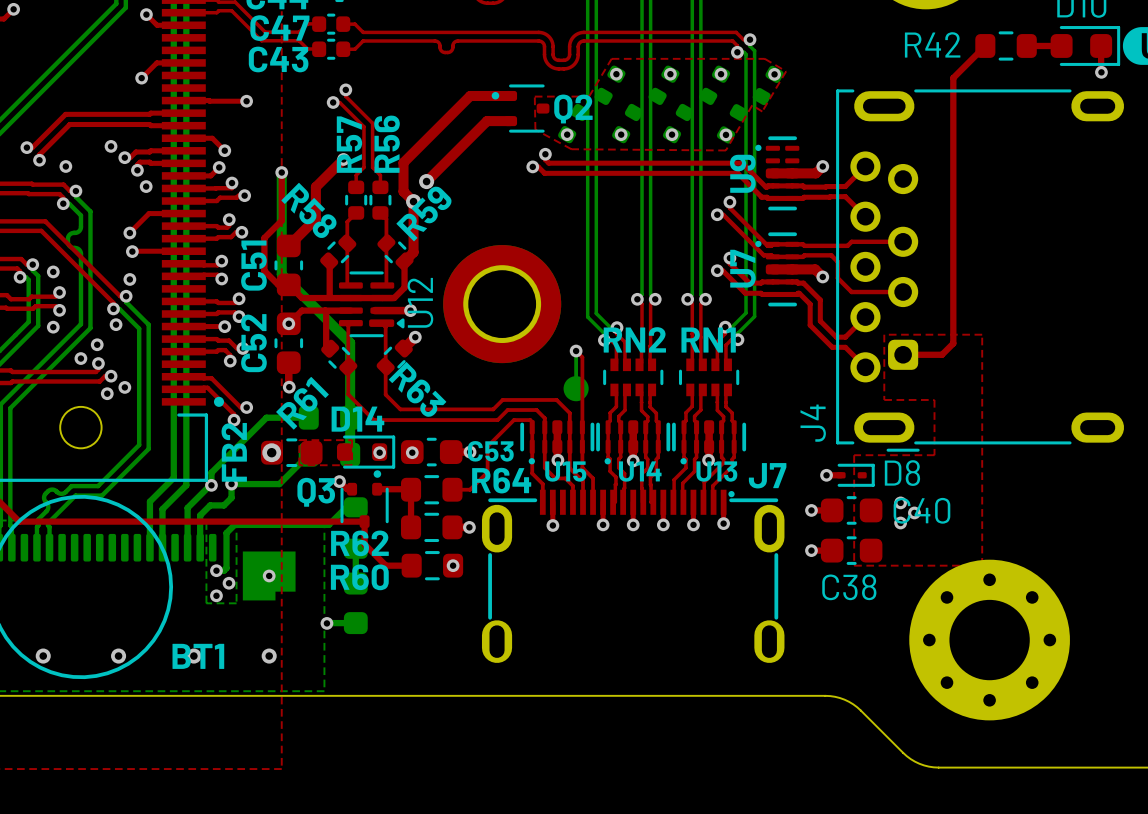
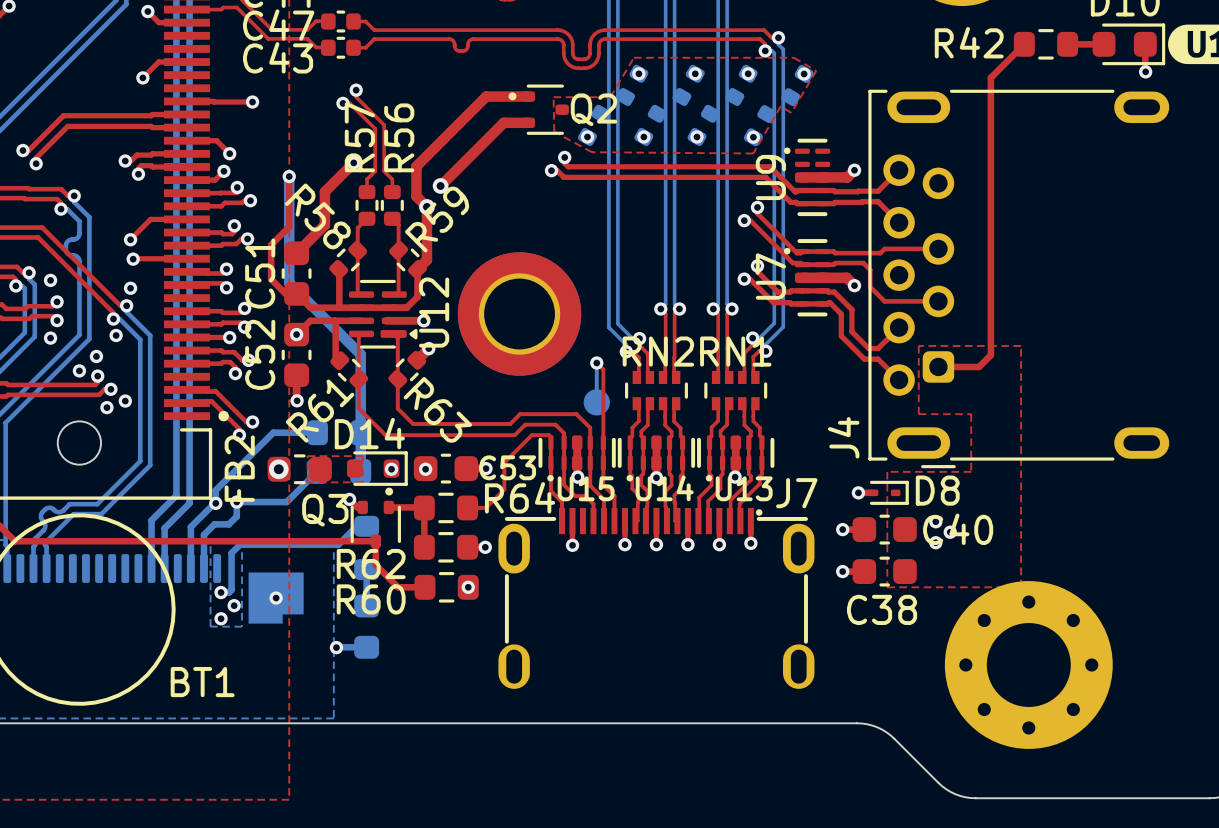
via: (111, 146) -> none
via: (65, 166) -> none
via: (146, 186) -> none
via: (43, 656) -> none
via: (118, 656) -> none
via: (193, 656) -> none
via: (269, 656) -> none

